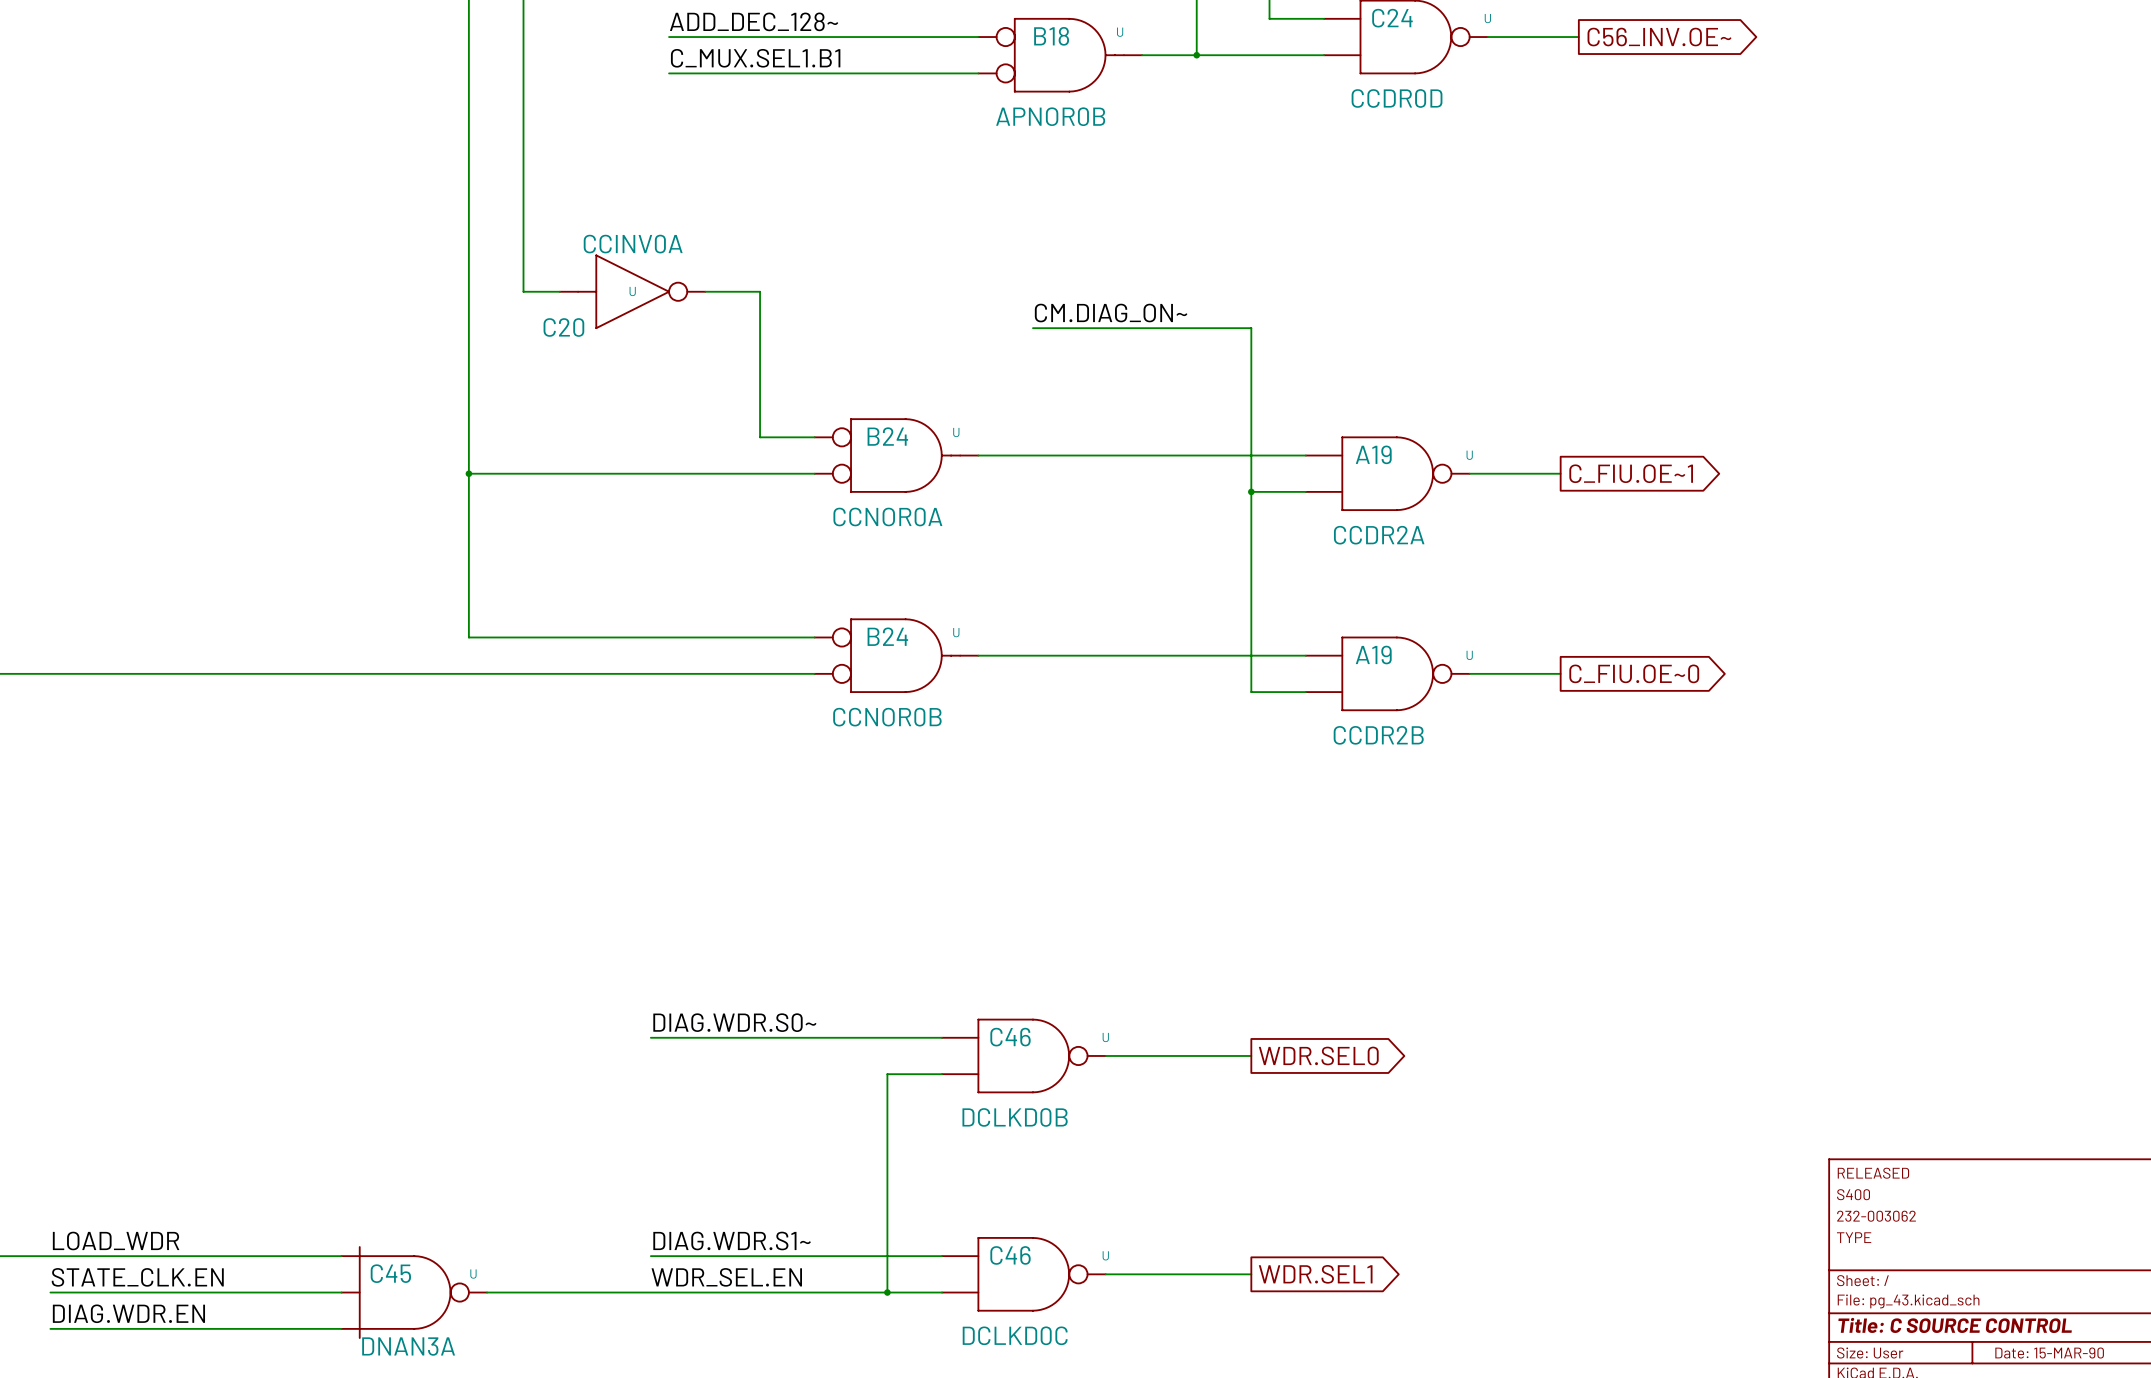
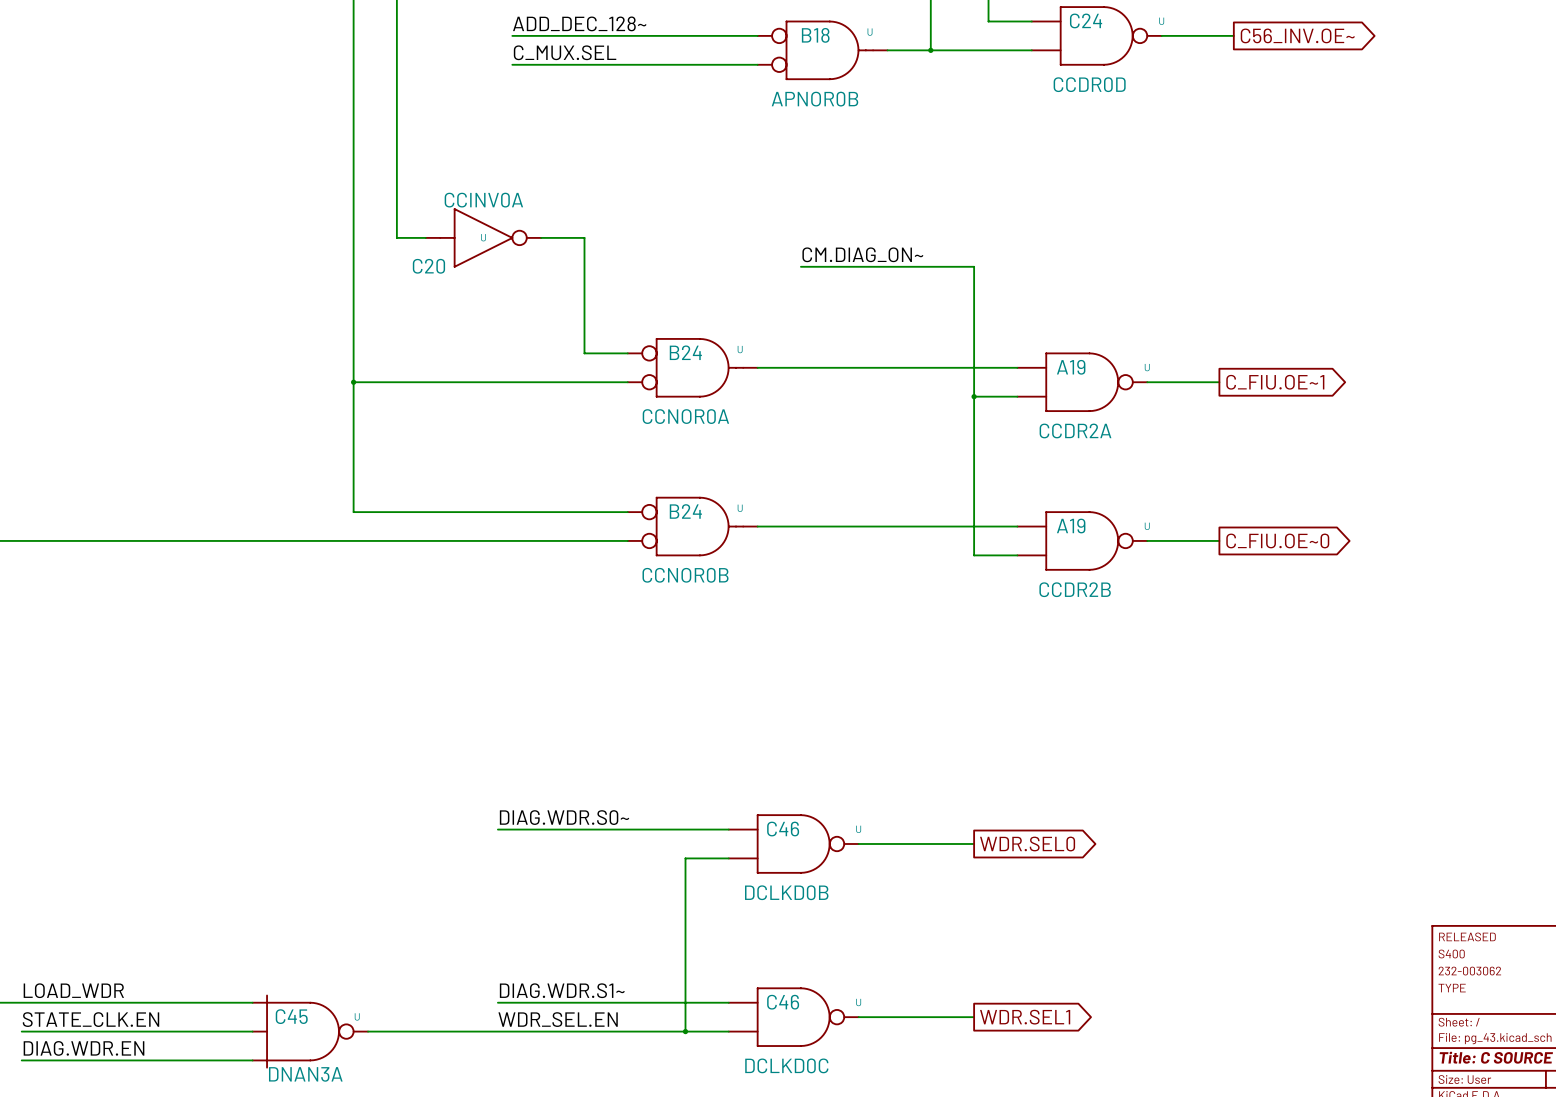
label: C_MUX.SEL1.B1 (755, 58) -> C_MUX.SEL (565, 52)

